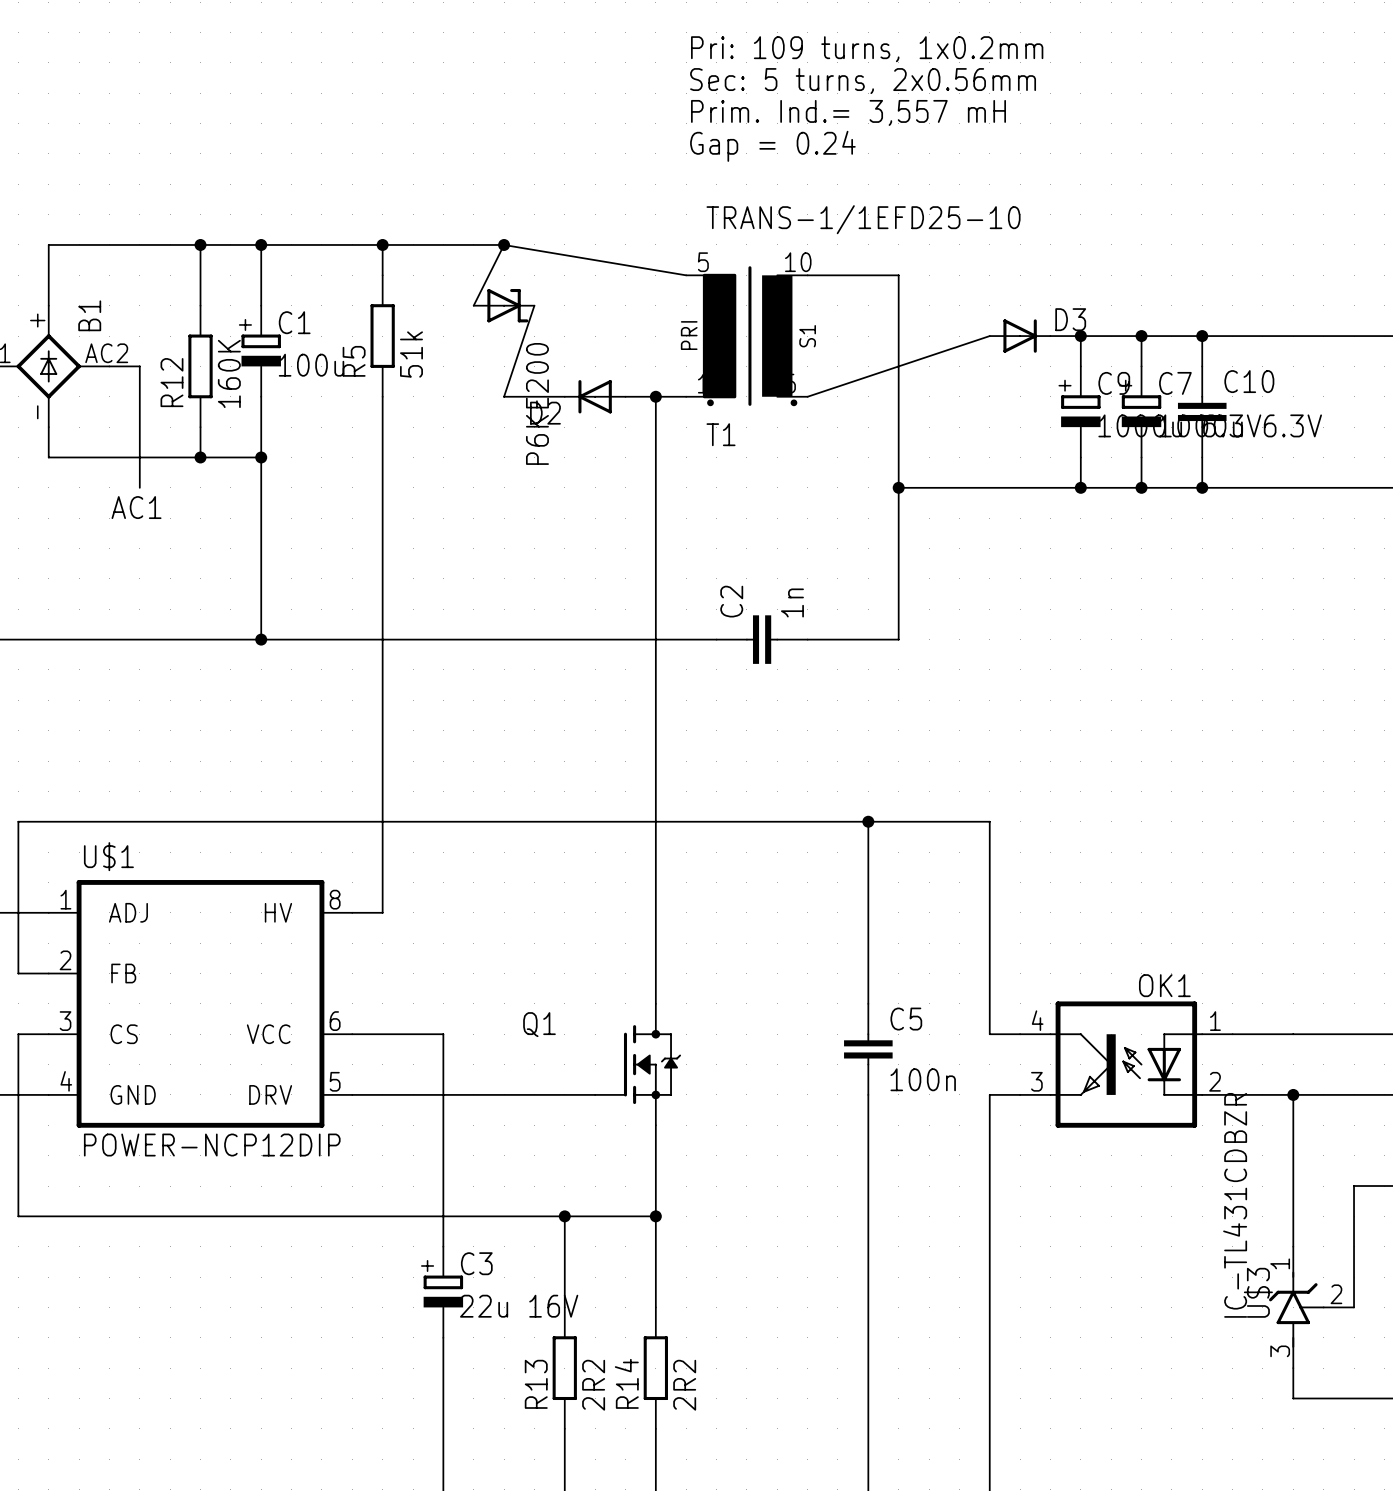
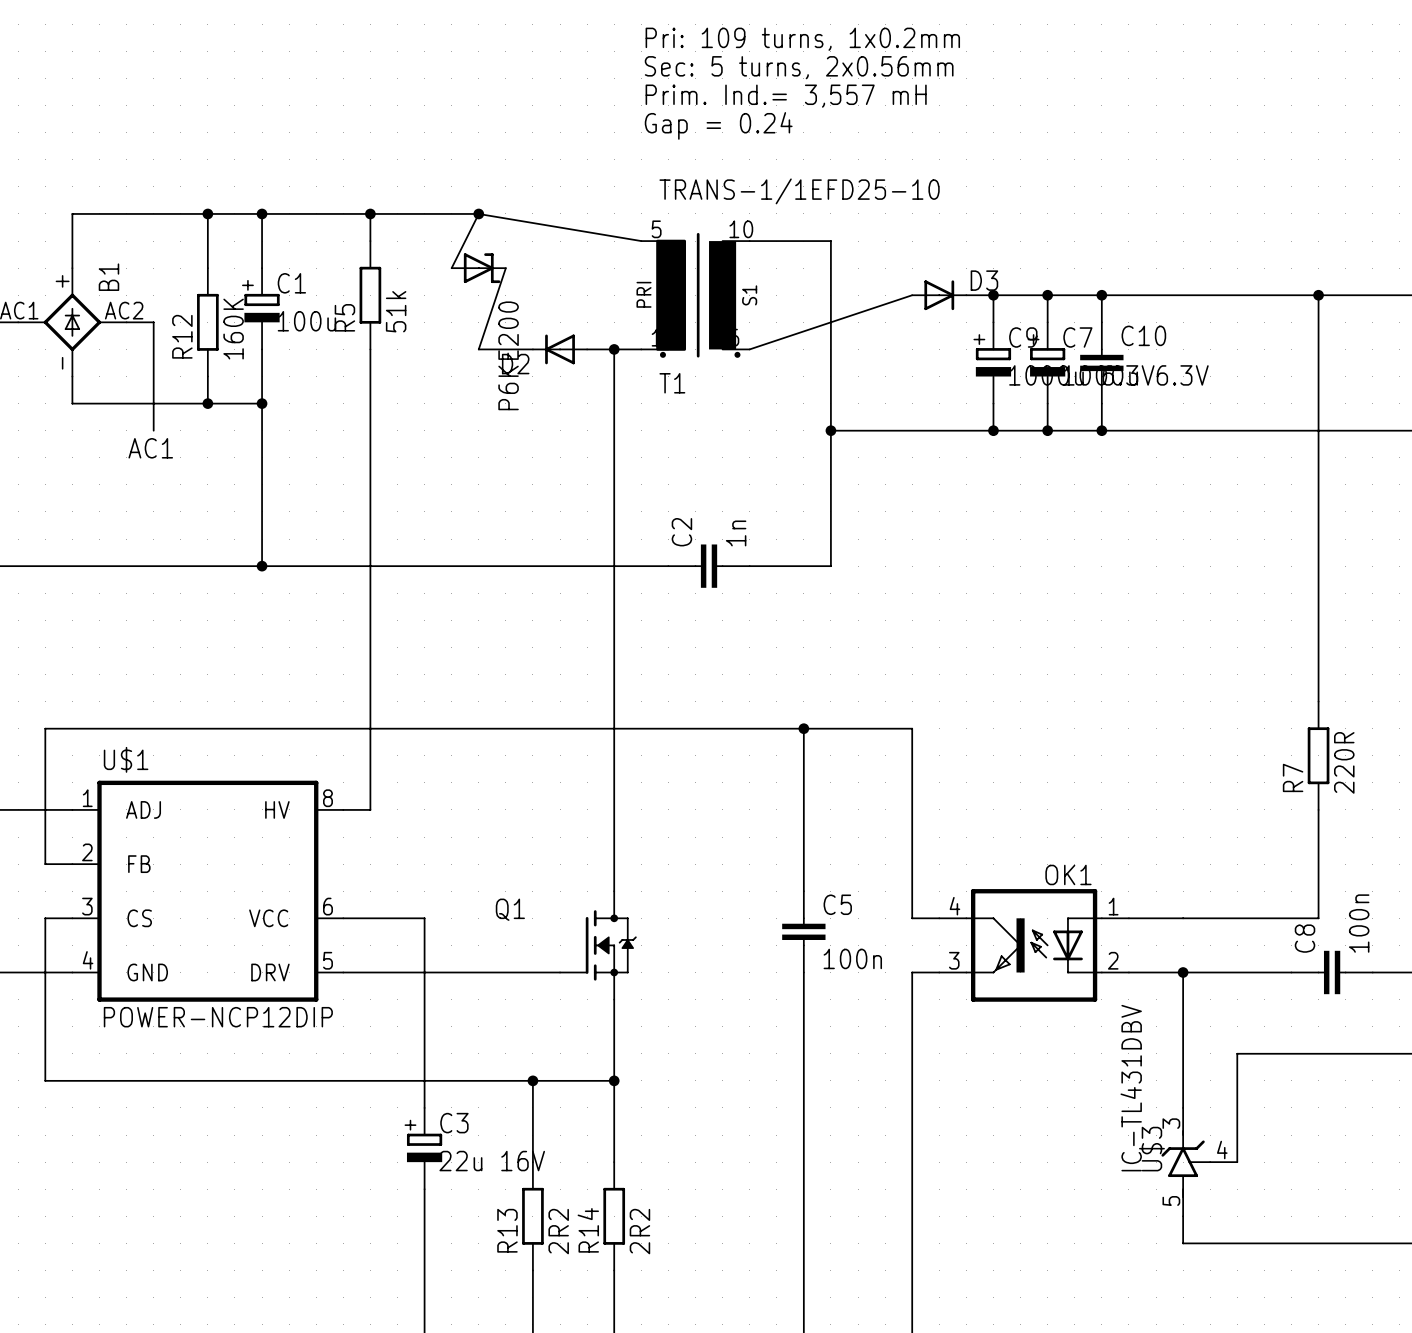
U$3 value: IC-TL431CDBZR (1235, 1205) -> IC-TL431DBV (1131, 1088)
U$3 pin number: 1 (1280, 1263) -> 3 (1171, 1123)
U$3 pin number: 2 (1336, 1294) -> 4 (1222, 1150)
U$3 pin number: 3 (1280, 1351) -> 5 (1171, 1200)

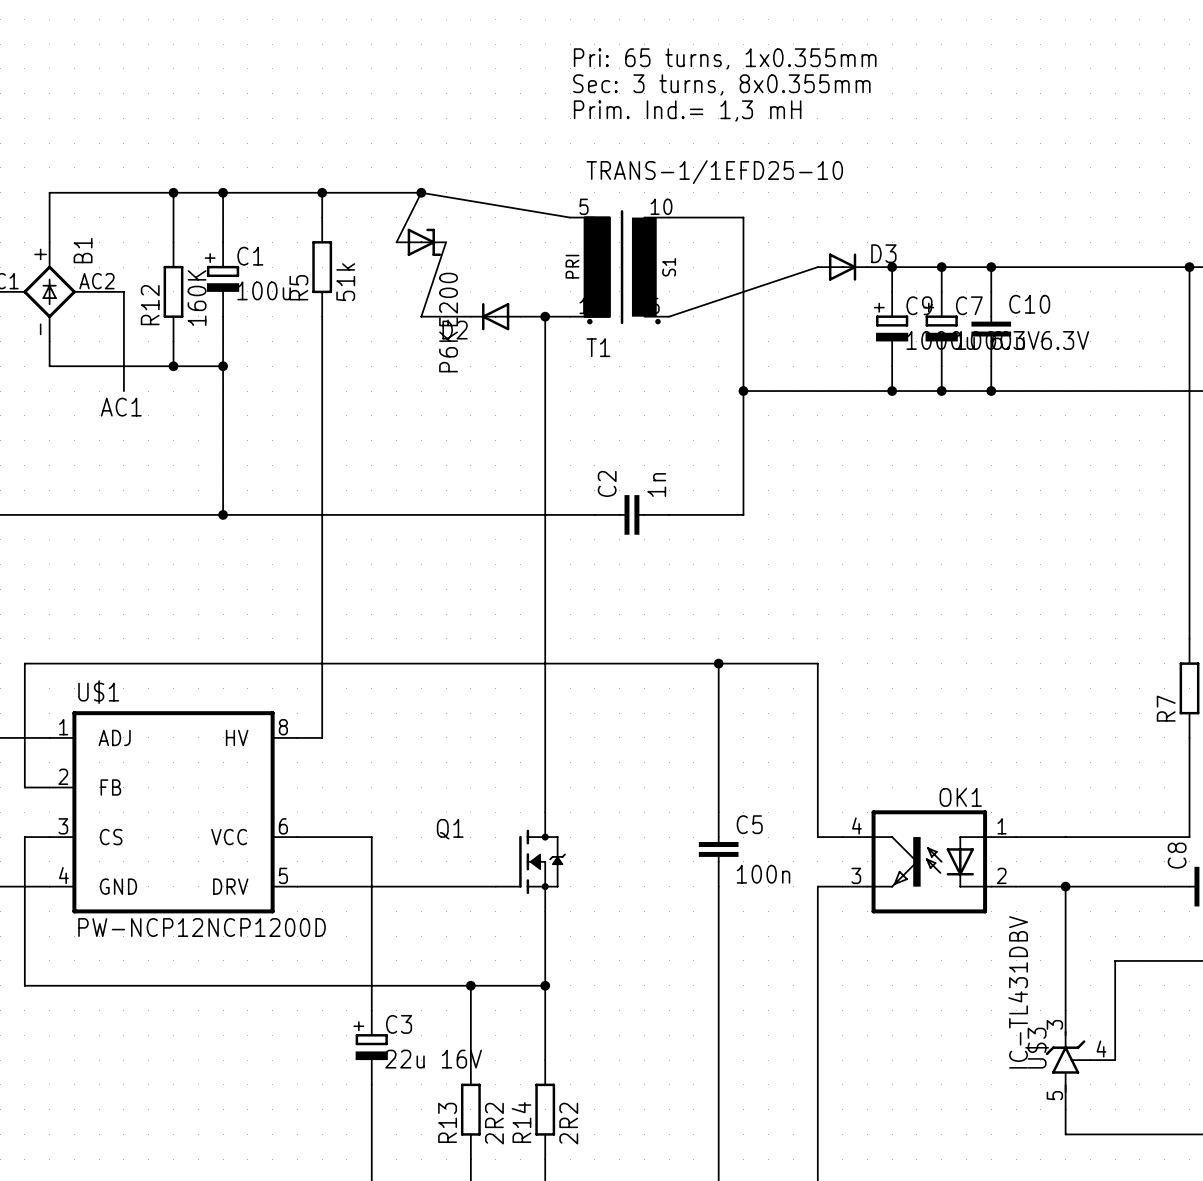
text: Pri: 109 turns, 1x0.2mm (802, 39) -> none
text: Sec: 5 turns, 2x0.56mm (799, 67) -> Pri: 65 turns, 1x0.355mm (725, 58)
text: Prim. Ind.= 3,557 mH (786, 96) -> Sec: 3 turns, 8x0.355mm (721, 84)
text: Gap = 0.24 (718, 125) -> Prim. Ind.= 1,3 mH (687, 110)
U$1 value: POWER-NCP12DIP (218, 1017) -> PW-NCP12NCP1200D (202, 927)

